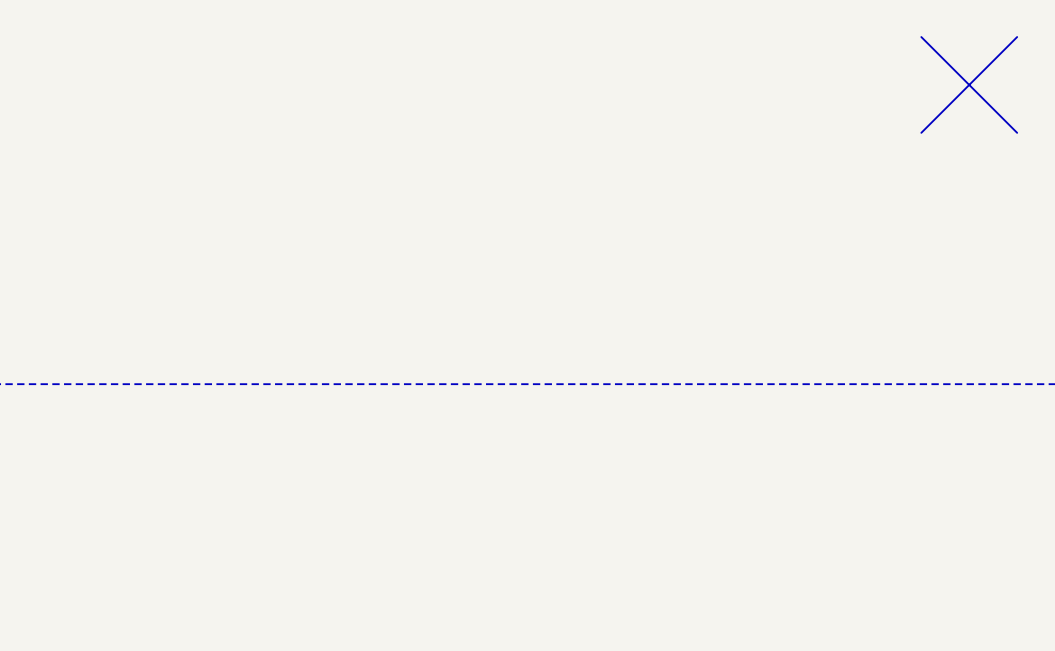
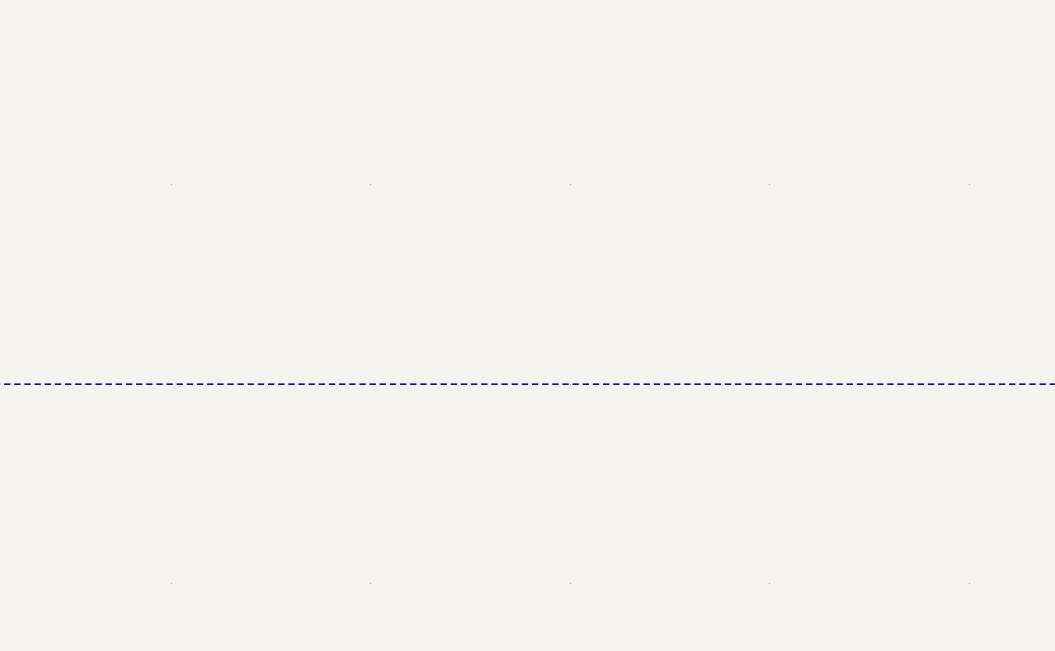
no-connect mark: (969, 84) -> none

